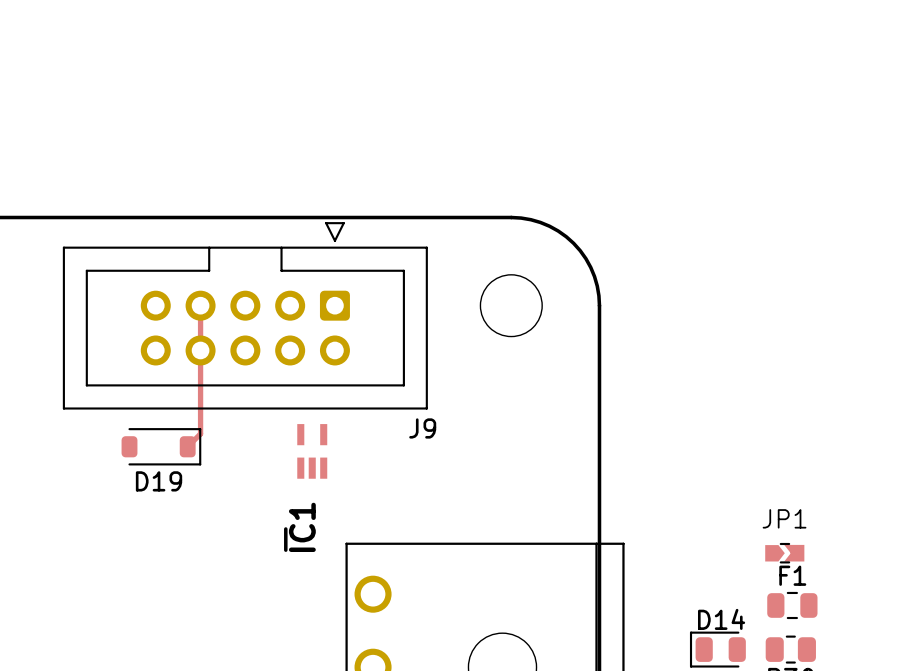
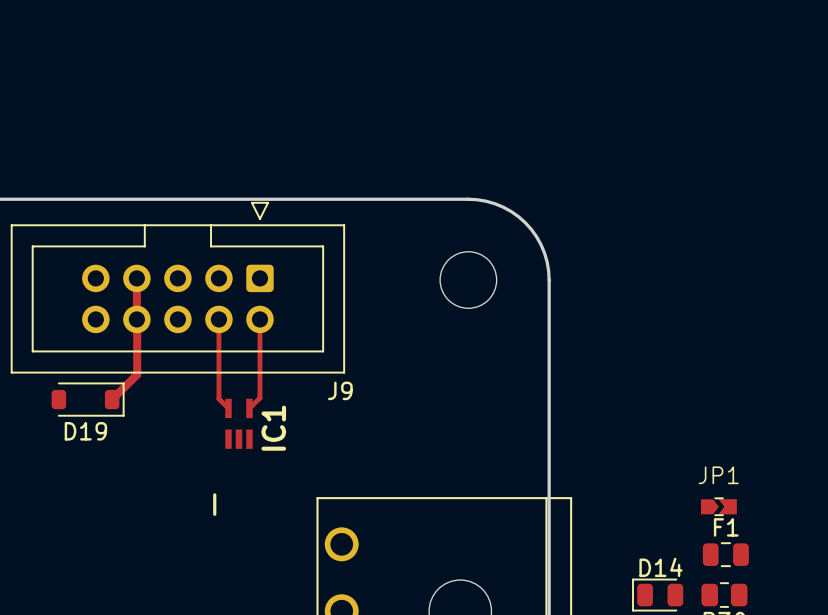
track: none -> (136, 278) (137, 374) (112, 399)
track: (200, 305) (200, 433) (187, 446) -> none
J9 position: (245, 315) -> (177, 287)
track: none -> (218, 319) (218, 398) (228, 408)
track: none -> (259, 319) (259, 397) (249, 408)
D19 position: (161, 446) -> (88, 399)
IC1 position: (305, 487) -> (232, 457)
IC1 name position: IC1 (302, 527) -> IC1 (273, 428)

